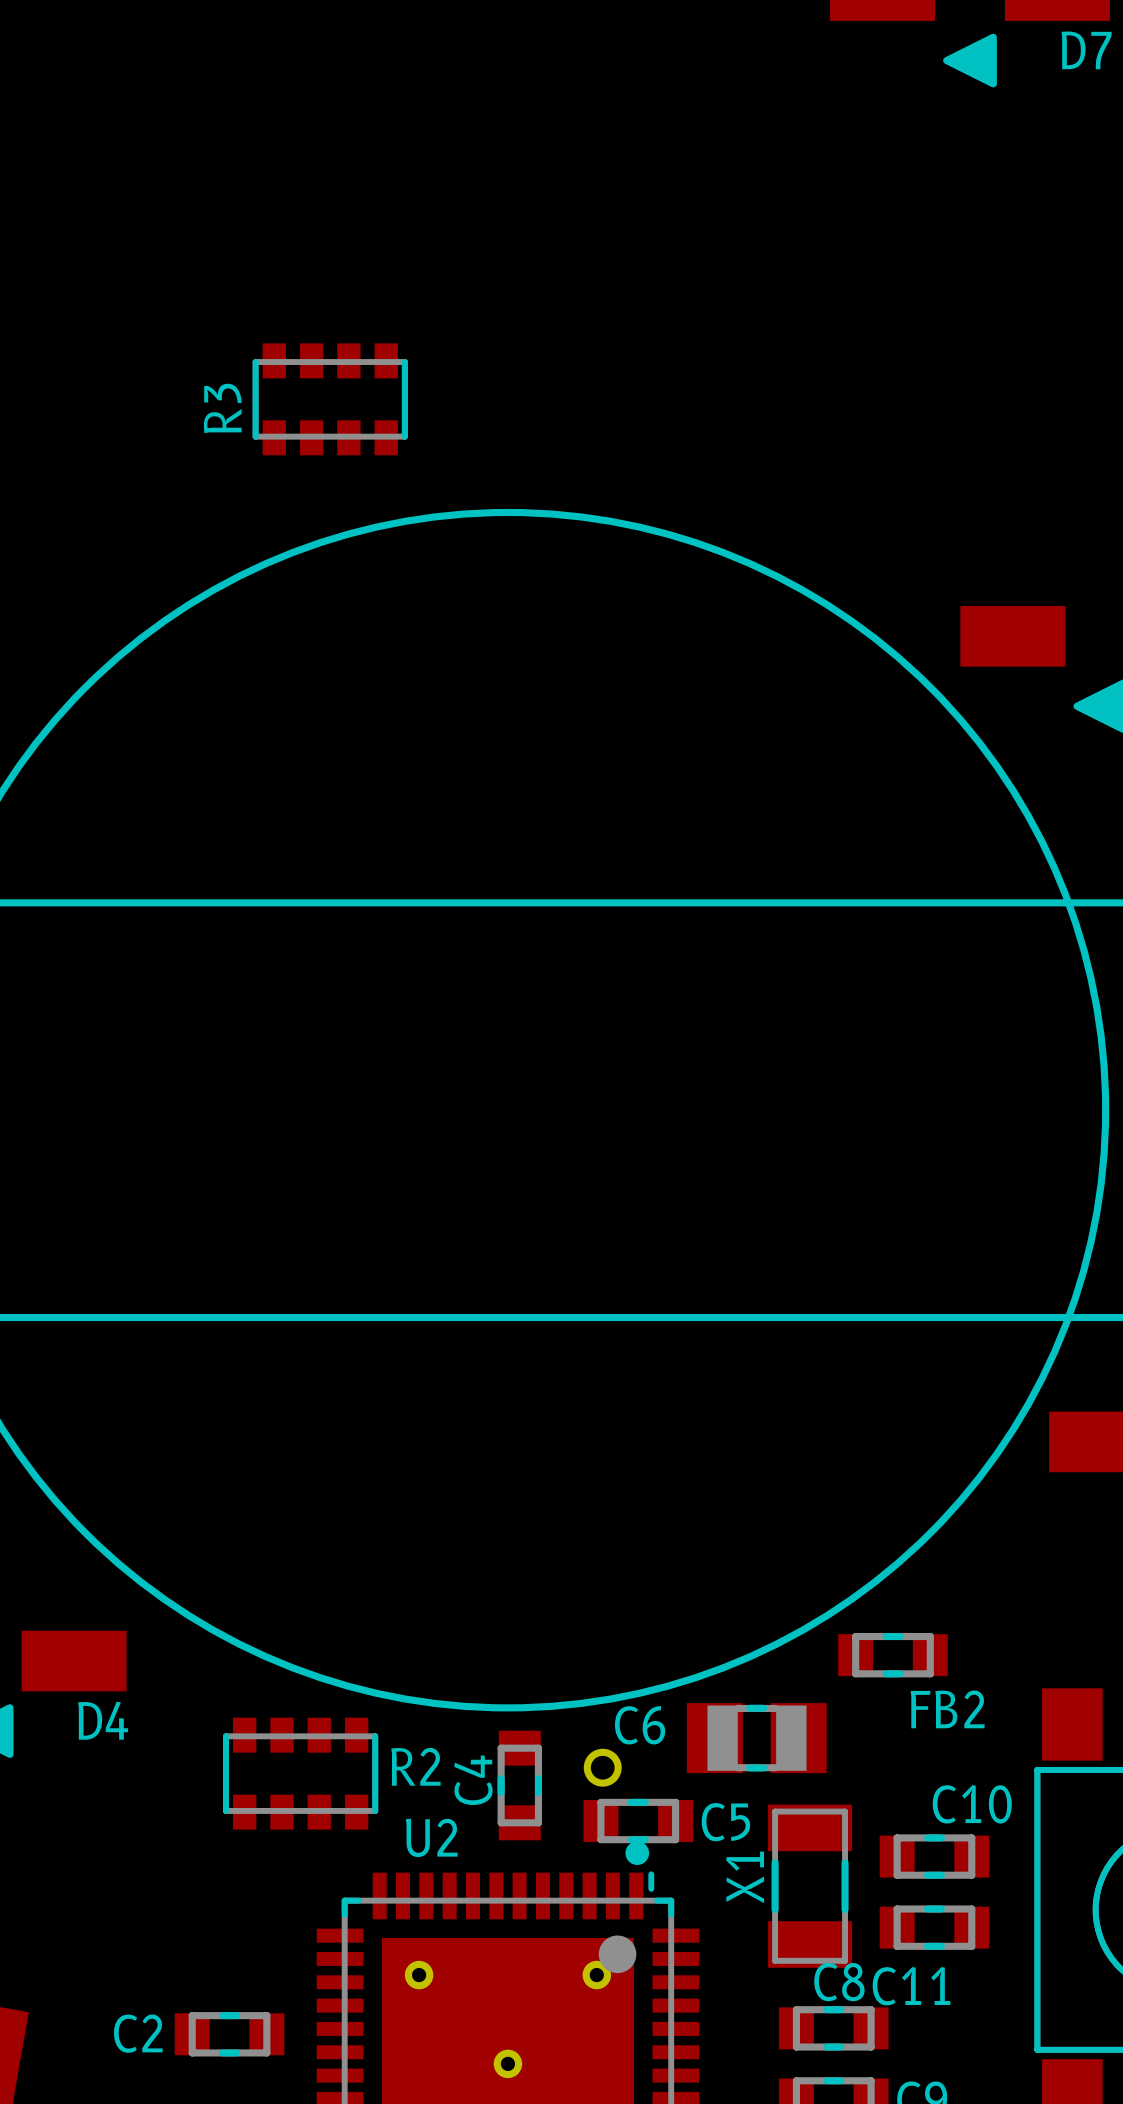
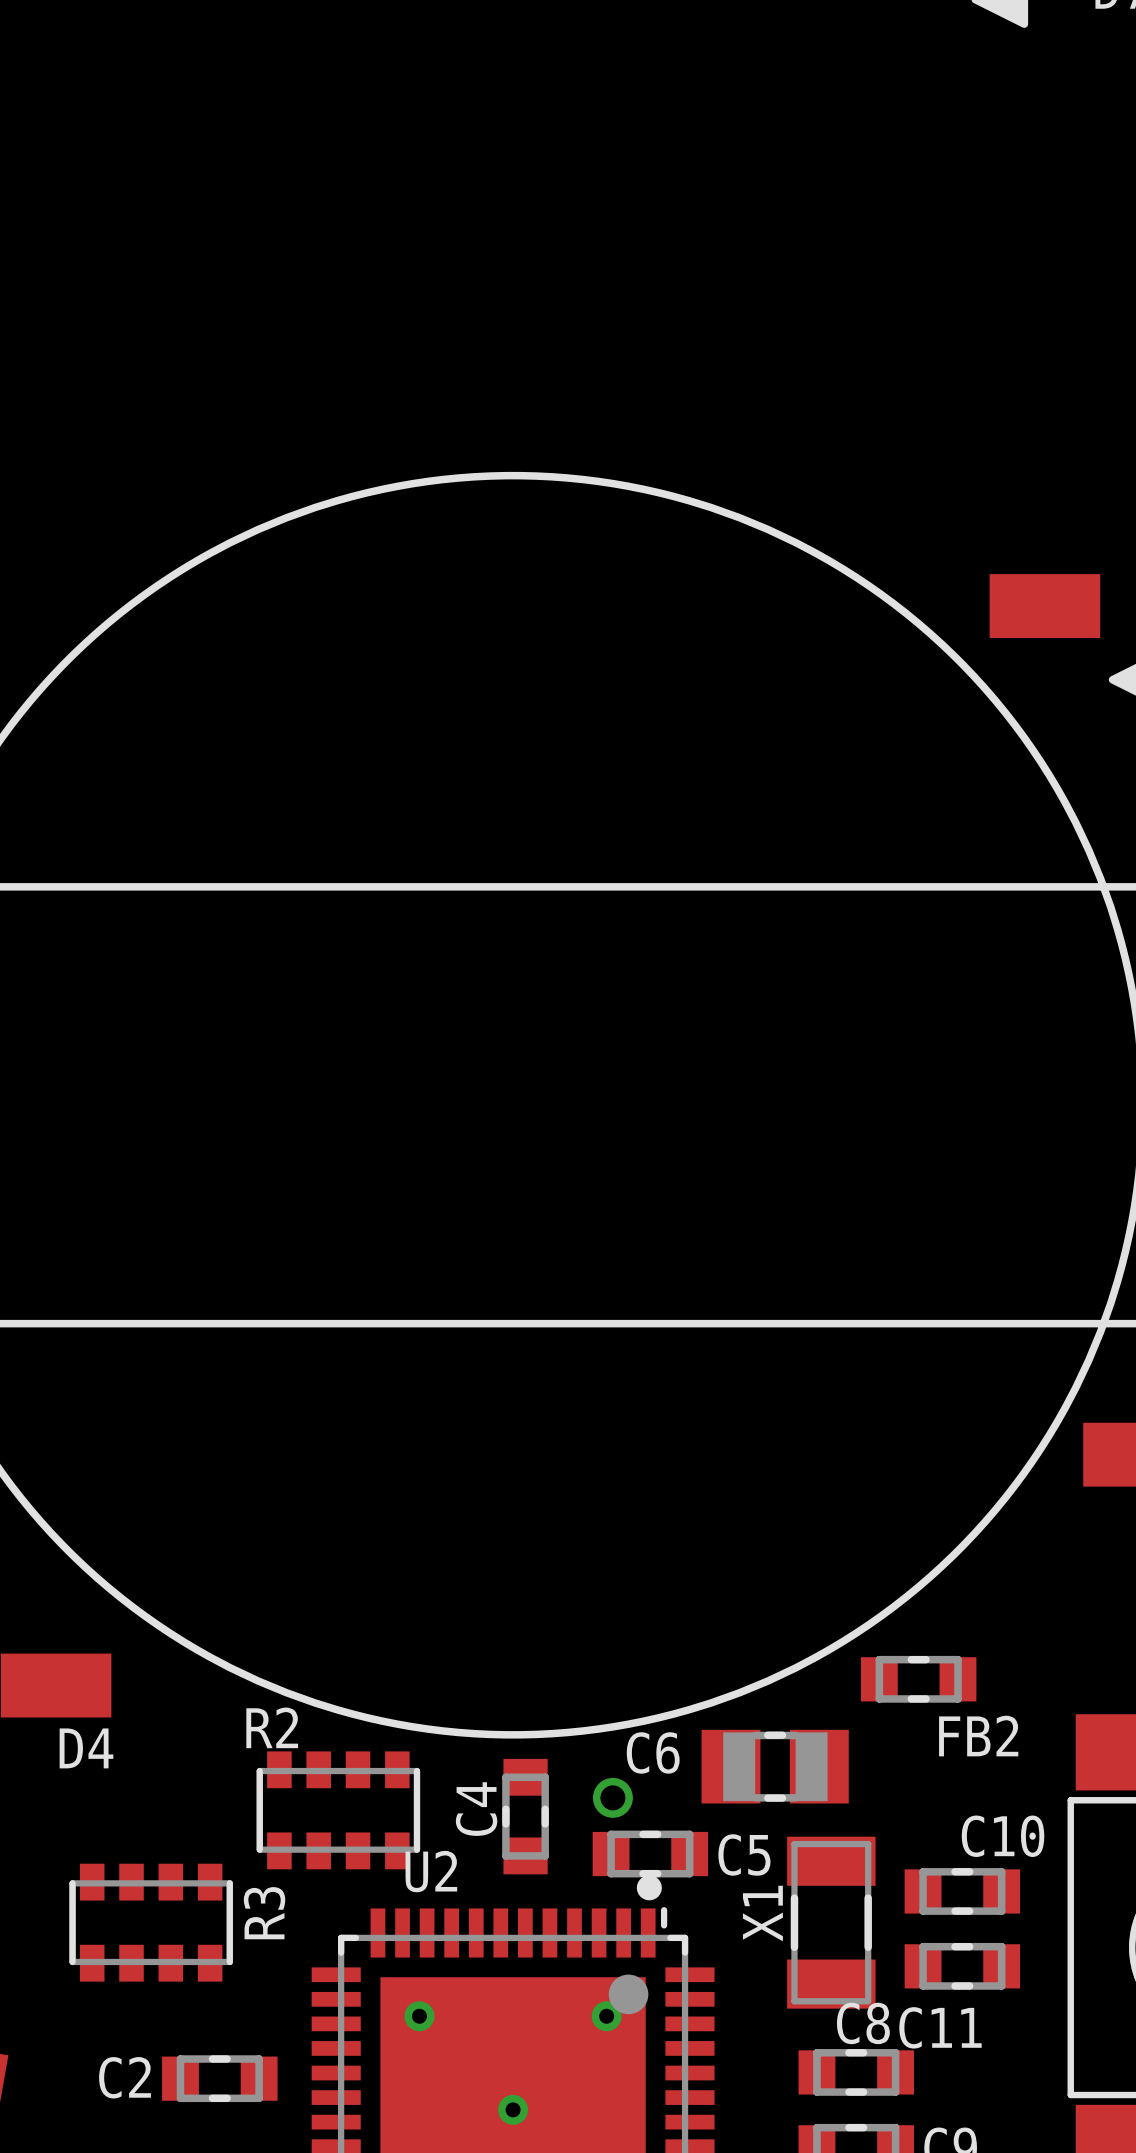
R3 position: (330, 399) -> (151, 1922)
R3 name position: R3 (222, 408) -> R3 (264, 1913)
R2 name position: R2 (415, 1766) -> R2 (272, 1727)
R2 position: (300, 1773) -> (338, 1810)

